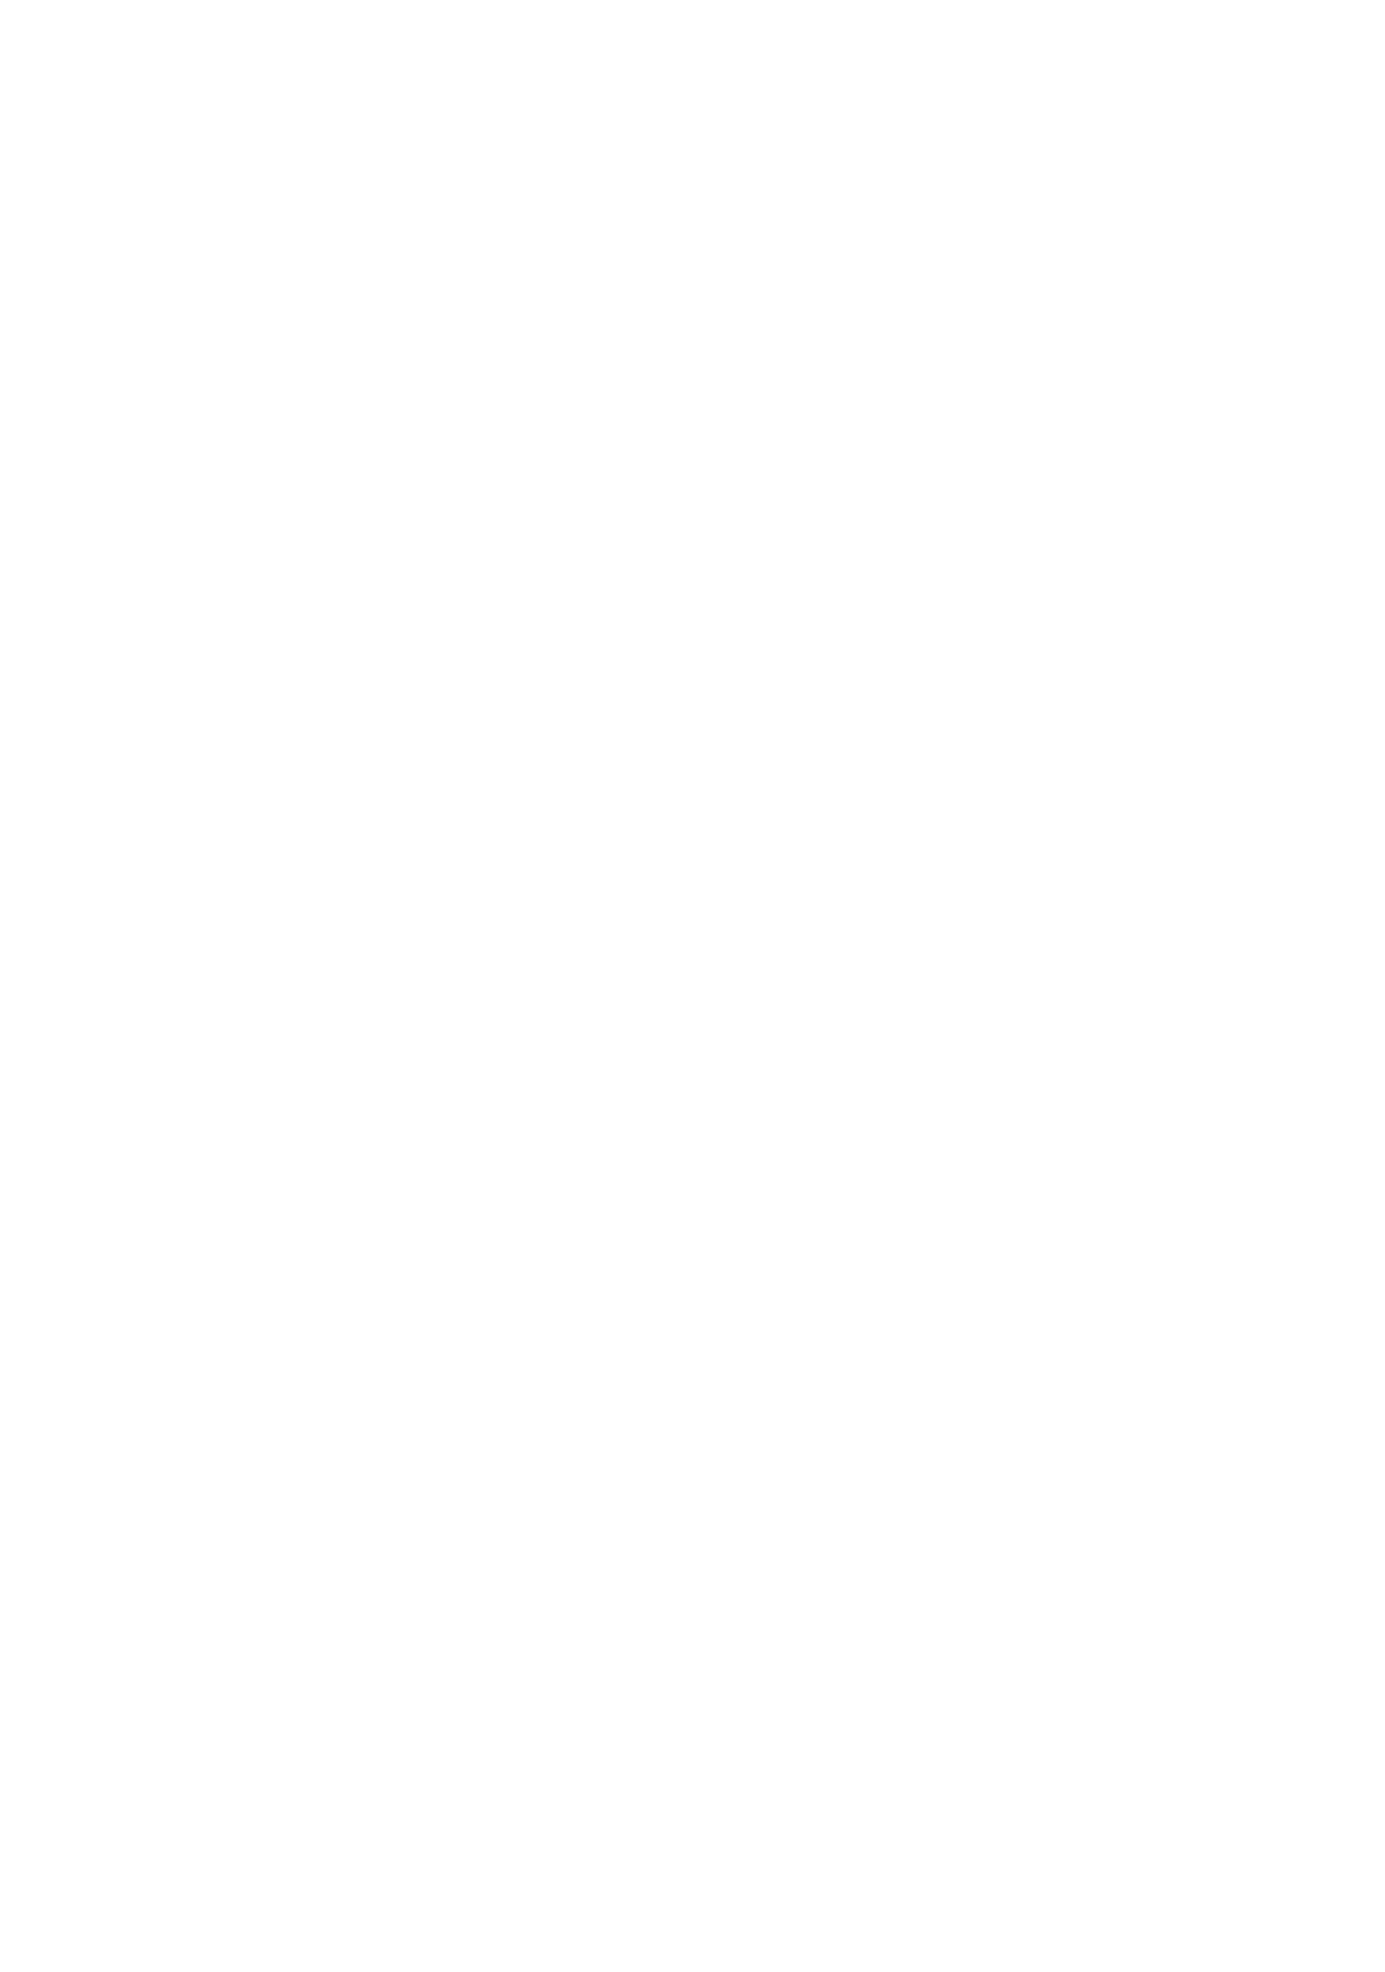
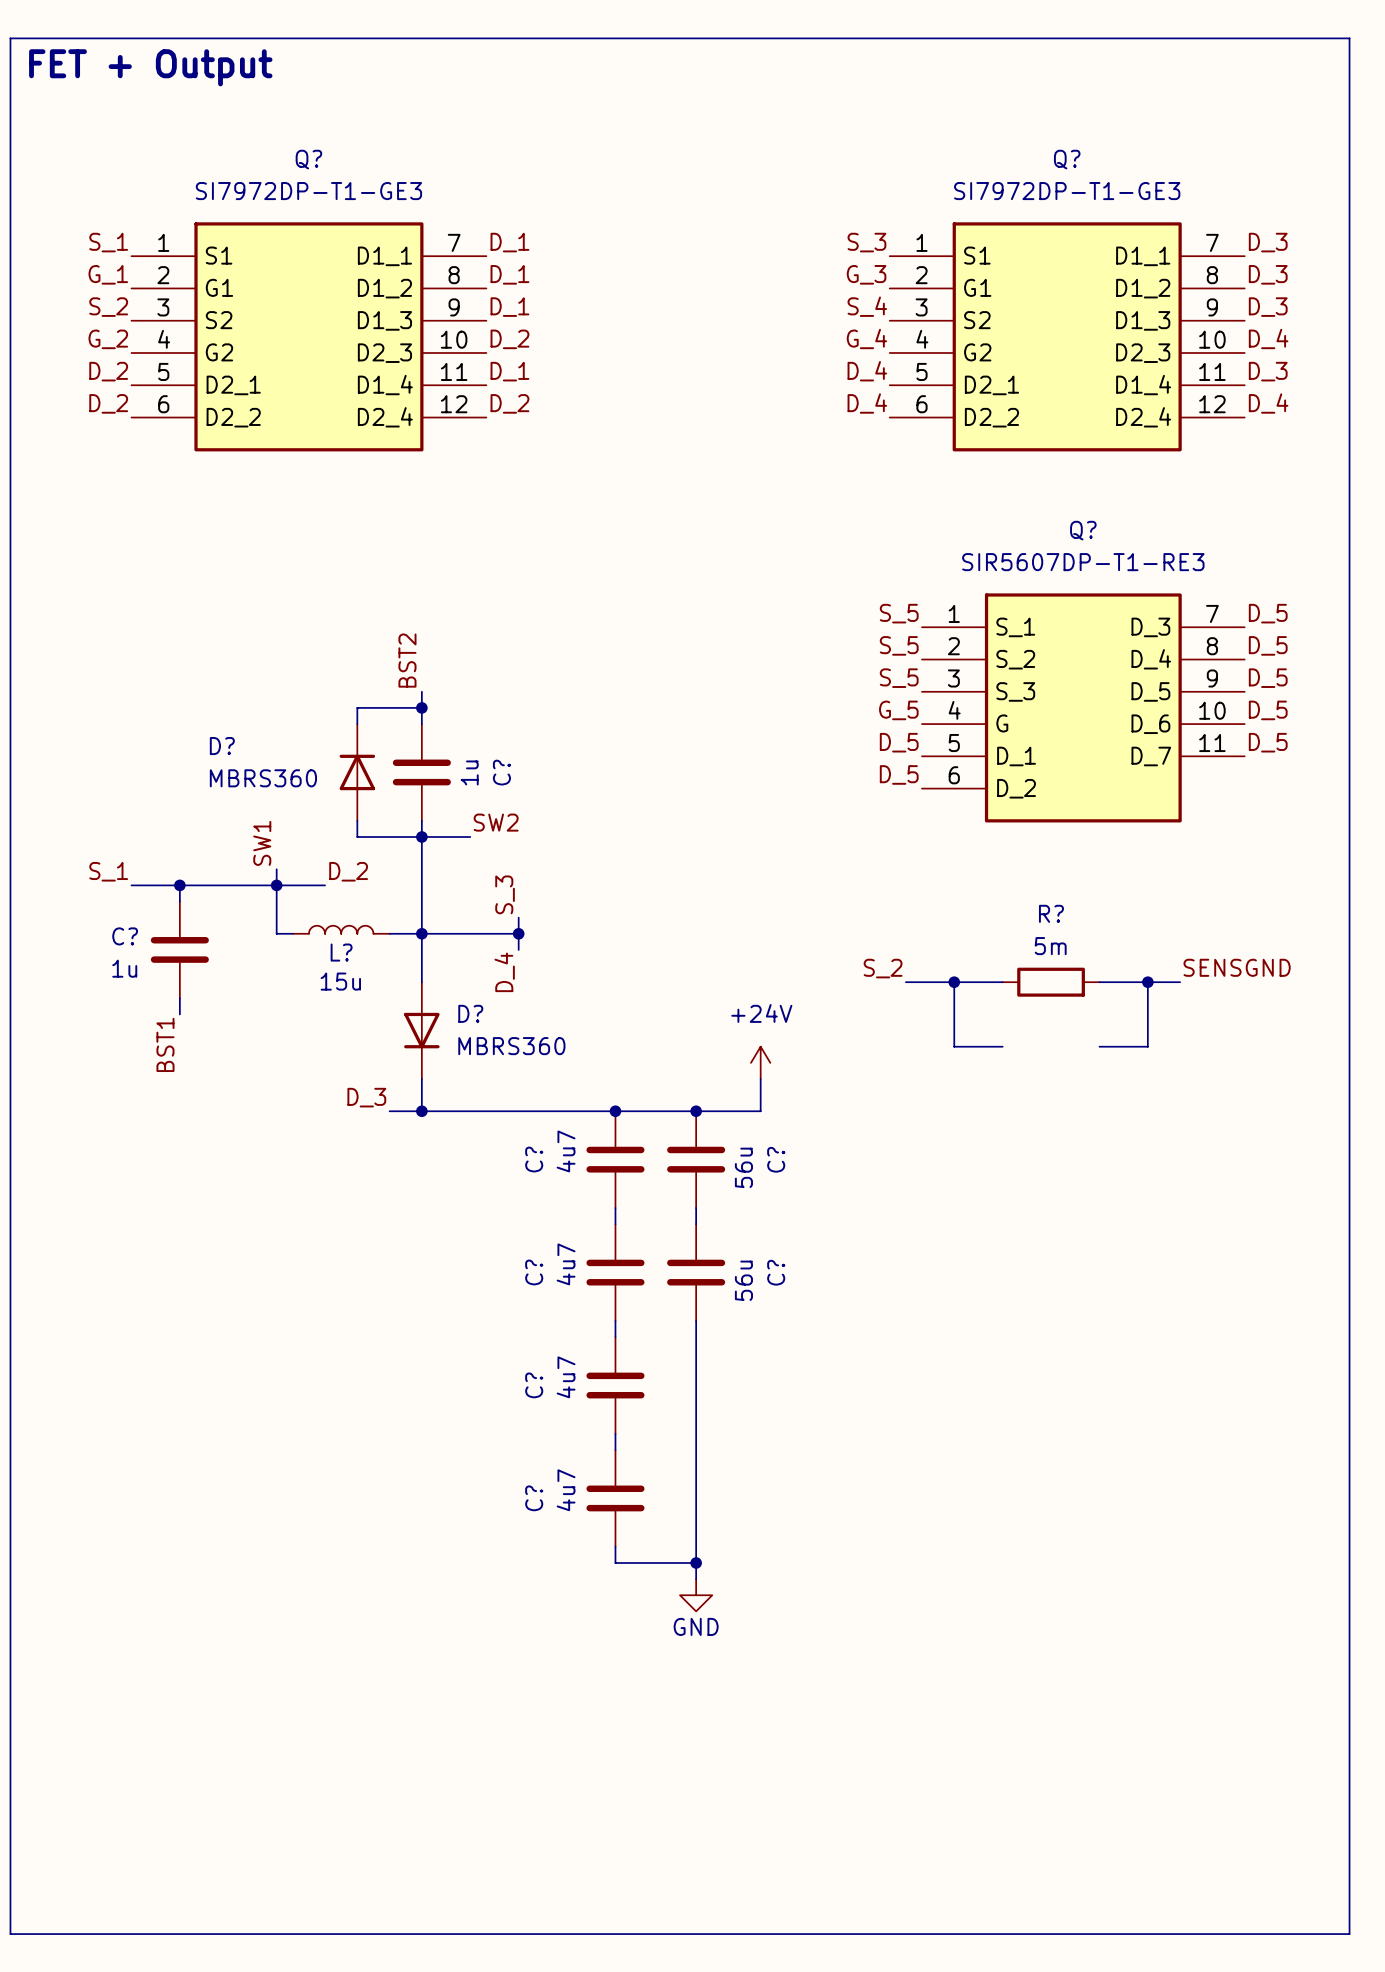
line: none -> (10, 38) (1349, 38) (1349, 1934) (10, 1934) (10, 38)
text: none -> FET + Output (150, 67)
label: none -> S_1 (108, 242)
label: none -> D_1 (509, 242)
label: none -> S_3 (866, 242)
label: none -> D_3 (1268, 242)
label: none -> G_1 (108, 274)
label: none -> D_1 (509, 274)
label: none -> G_3 (866, 274)
label: none -> D_3 (1268, 274)
label: none -> S_2 (108, 307)
label: none -> D_1 (509, 307)
label: none -> S_4 (867, 306)
label: none -> D_3 (1268, 307)
Q?: none -> SI7972DP-T1-GE3 (308, 336)
Q?: none -> SI7972DP-T1-GE3 (1067, 336)
label: none -> G_2 (108, 339)
label: none -> D_2 (509, 339)
label: none -> G_4 (866, 338)
label: none -> D_4 (1268, 338)
label: none -> D_2 (108, 371)
label: none -> D_1 (509, 371)
label: none -> D_4 (867, 371)
label: none -> D_3 (1268, 371)
label: none -> D_2 (108, 403)
label: none -> D_2 (509, 403)
label: none -> D_4 (867, 403)
label: none -> D_4 (1268, 403)
label: none -> S_5 (899, 613)
label: none -> D_5 (1268, 613)
label: none -> S_5 (899, 645)
label: none -> D_5 (1268, 645)
label: none -> BST2 (407, 660)
label: none -> S_5 (899, 678)
label: none -> D_5 (1268, 678)
wire: none -> (421, 691) (421, 724)
wire: none -> (421, 707) (357, 707) (357, 724)
junction: none -> (421, 707)
Q?: none -> SIR5607DP-T1-RE3 (1083, 707)
label: none -> G_5 (898, 710)
label: none -> D_5 (1268, 710)
label: none -> D_5 (899, 742)
label: none -> D_5 (1268, 742)
D?: none -> MBRS360 (357, 772)
C?: none -> 1u (421, 772)
label: none -> D_5 (899, 774)
wire: none -> (357, 820) (357, 836) (470, 836)
wire: none -> (421, 820) (421, 982)
label: none -> SW2 (496, 822)
junction: none -> (421, 836)
label: none -> SW1 (262, 843)
wire: none -> (276, 869) (276, 933) (292, 933)
label: none -> S_1 (108, 871)
label: none -> D_2 (348, 871)
wire: none -> (131, 885) (325, 885)
wire: none -> (179, 885) (179, 901)
junction: none -> (179, 885)
junction: none -> (276, 885)
label: none -> S_3 (505, 894)
wire: none -> (518, 917) (518, 949)
L?: none -> 15u (341, 929)
wire: none -> (389, 933) (518, 933)
junction: none -> (421, 933)
junction: none -> (518, 933)
C?: none -> 1u (179, 949)
label: none -> SENSGND (1237, 967)
label: none -> D_4 (504, 972)
label: none -> S_2 (883, 968)
wire: none -> (905, 982) (1002, 982)
wire: none -> (954, 982) (954, 1046) (1002, 1046)
junction: none -> (954, 982)
R?: none -> 5m (1051, 982)
wire: none -> (1099, 982) (1180, 982)
wire: none -> (1147, 982) (1147, 1046) (1099, 1046)
junction: none -> (1147, 982)
wire: none -> (179, 998) (179, 1014)
D?: none -> MBRS360 (421, 1030)
label: none -> BST1 (165, 1044)
power symbol: none -> +24V (760, 1062)
wire: none -> (421, 1078) (421, 1111)
wire: none -> (760, 1078) (760, 1111) (389, 1111)
label: none -> D_3 (366, 1097)
junction: none -> (421, 1111)
junction: none -> (615, 1111)
junction: none -> (696, 1111)
C?: none -> 4u7 (615, 1159)
C?: none -> 56u (696, 1159)
wire: none -> (615, 1208) (615, 1224)
wire: none -> (696, 1208) (696, 1224)
C?: none -> 4u7 (615, 1272)
C?: none -> 56u (696, 1272)
wire: none -> (615, 1320) (615, 1337)
wire: none -> (696, 1320) (696, 1579)
C?: none -> 4u7 (615, 1385)
wire: none -> (615, 1433) (615, 1450)
C?: none -> 4u7 (615, 1498)
wire: none -> (615, 1546) (615, 1562) (696, 1562)
junction: none -> (696, 1562)
power symbol: none -> GND (696, 1595)

